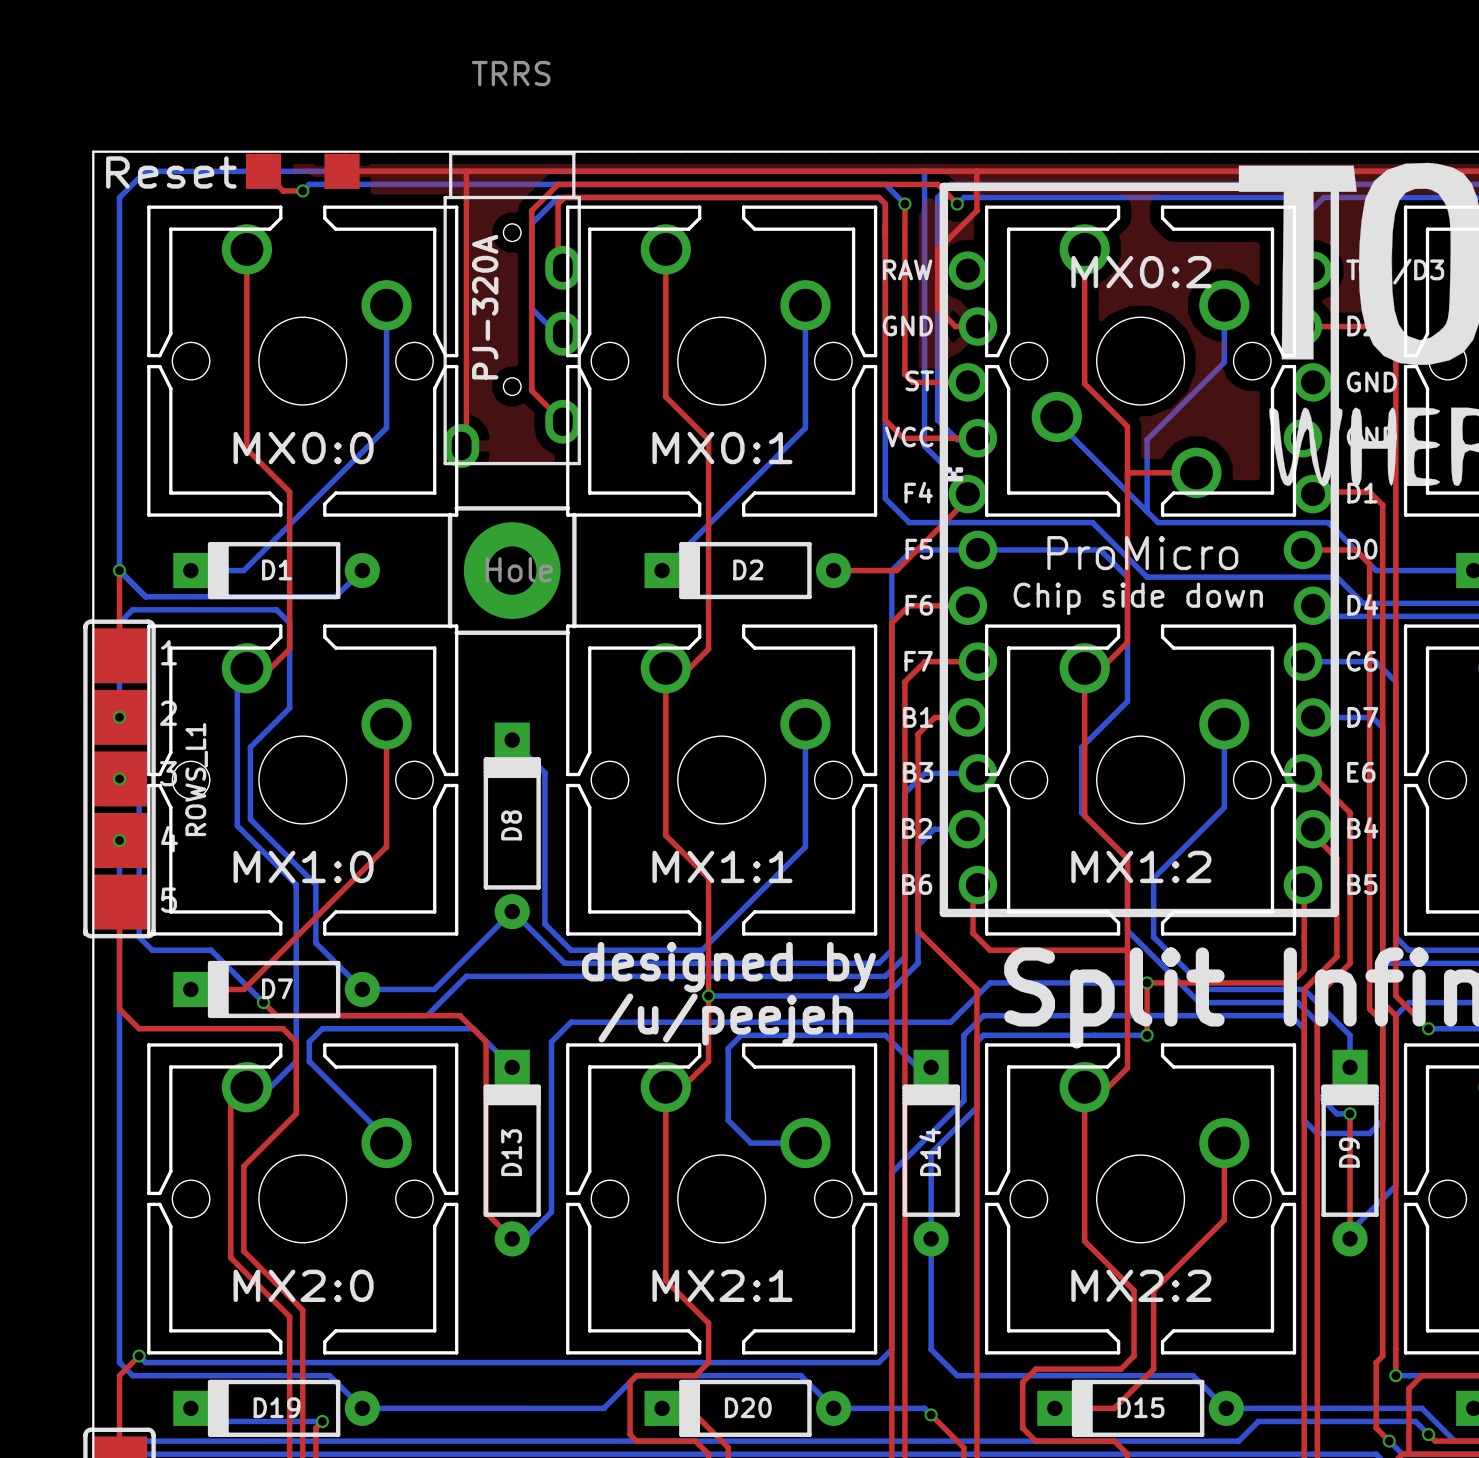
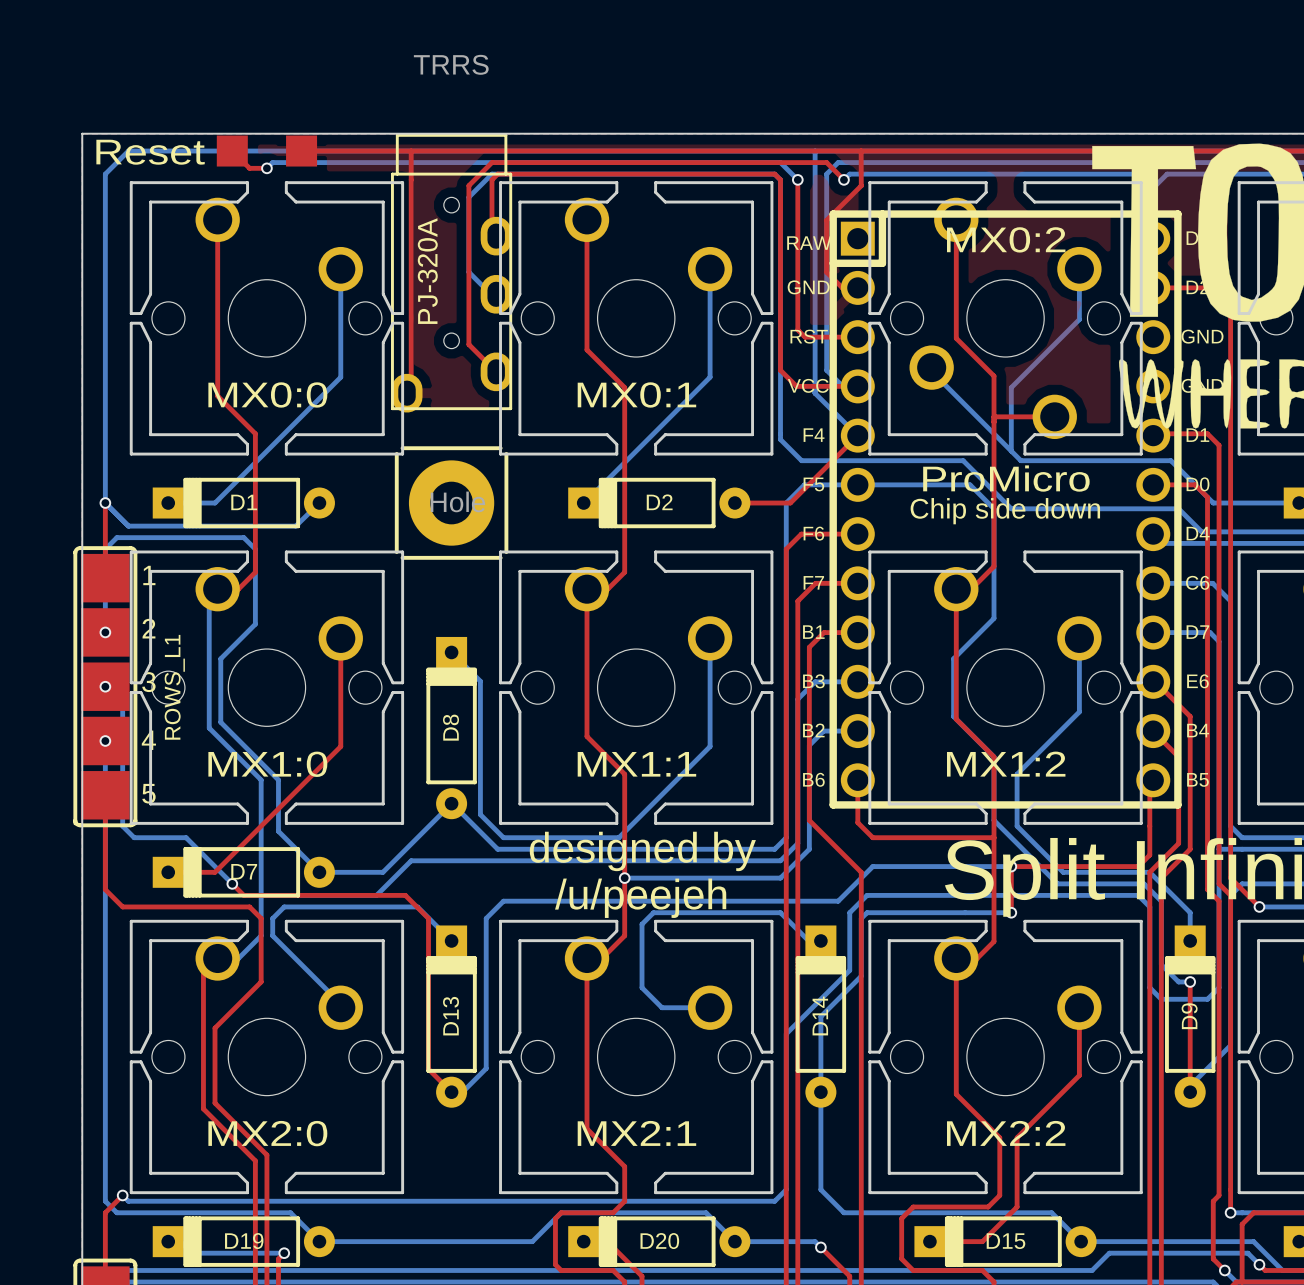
part: (1139, 549) -> none
part: none -> ProMicro (1005, 509)

